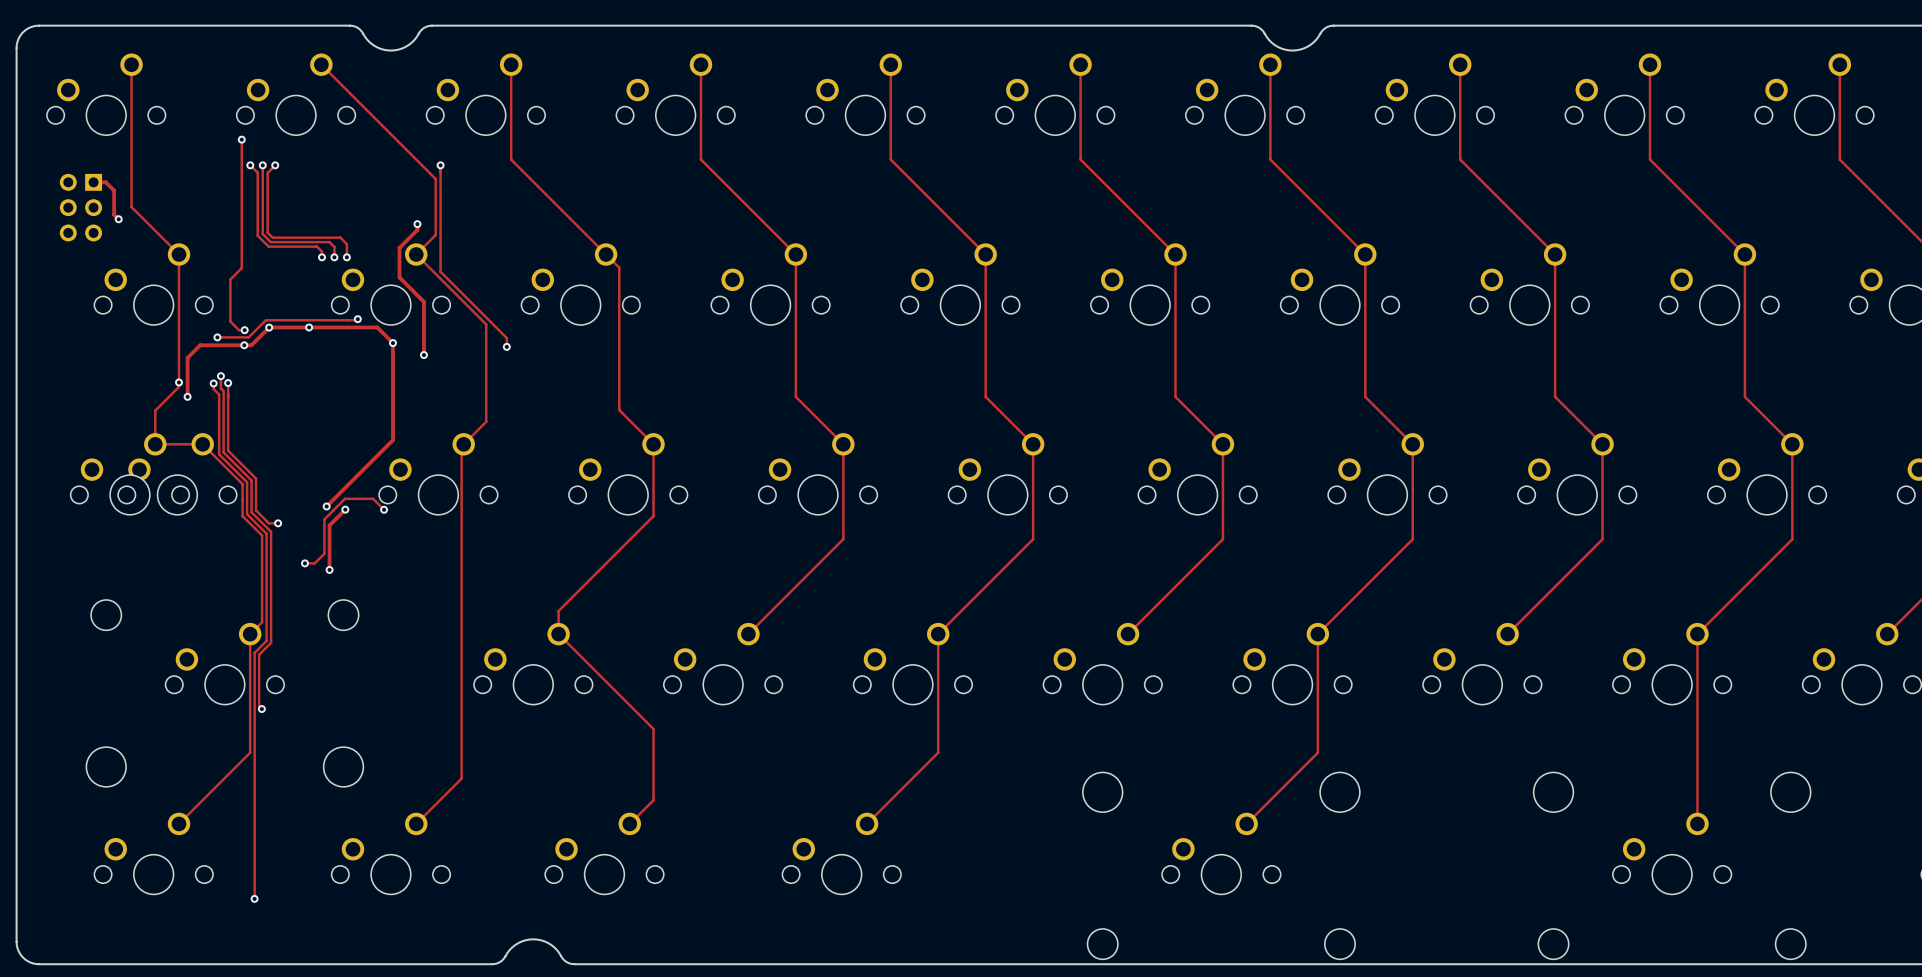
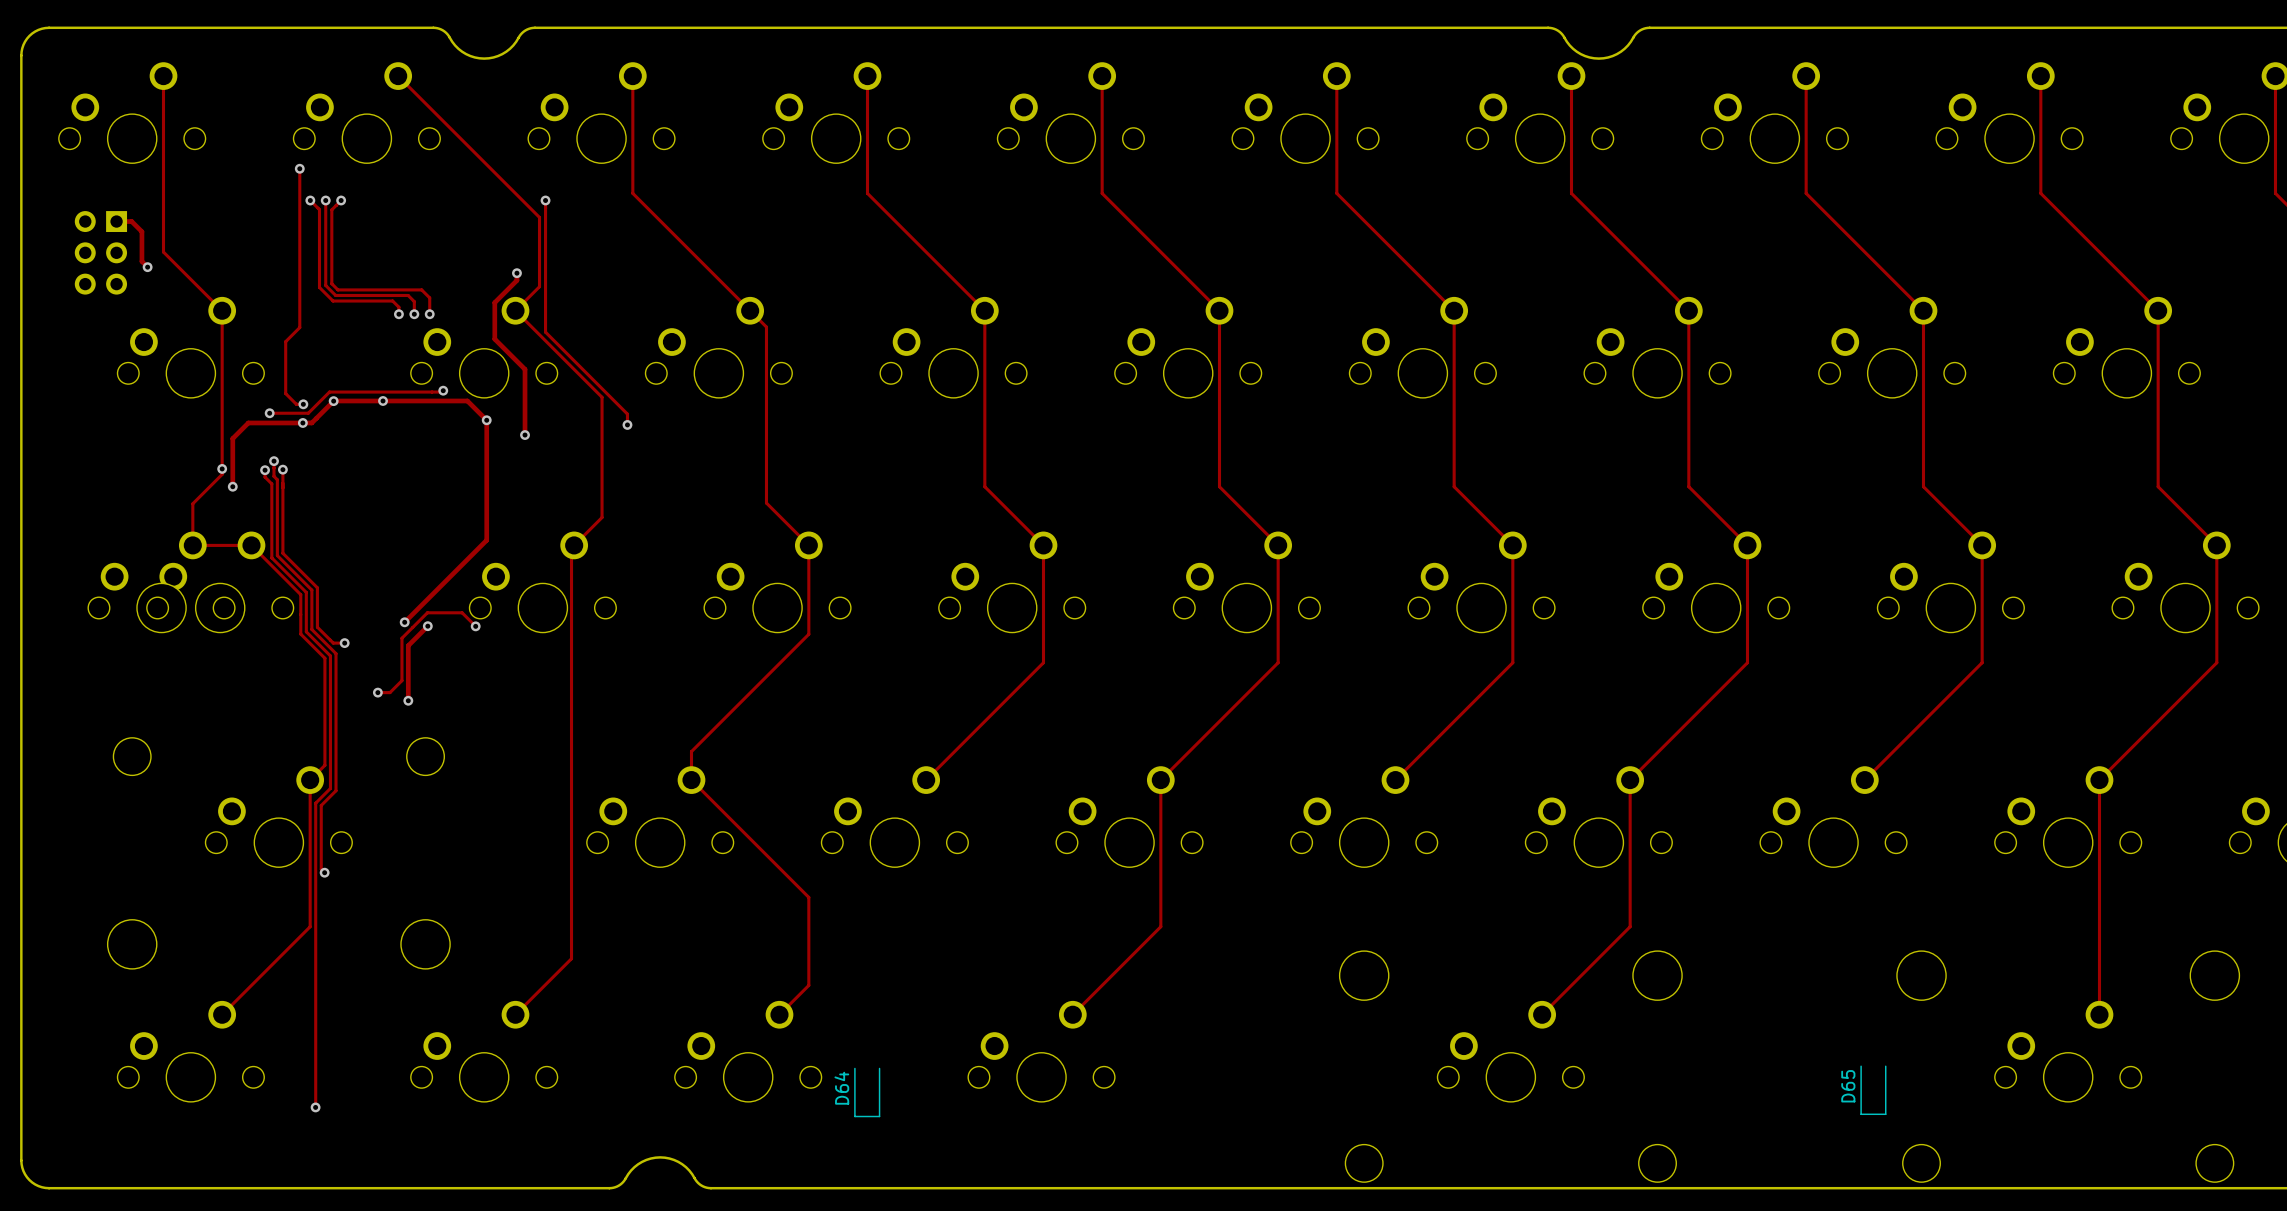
D65: none -> (1873, 1090)
D64: none -> (867, 1092)

